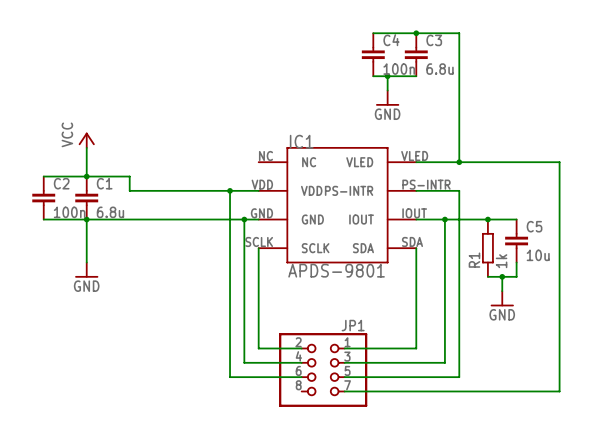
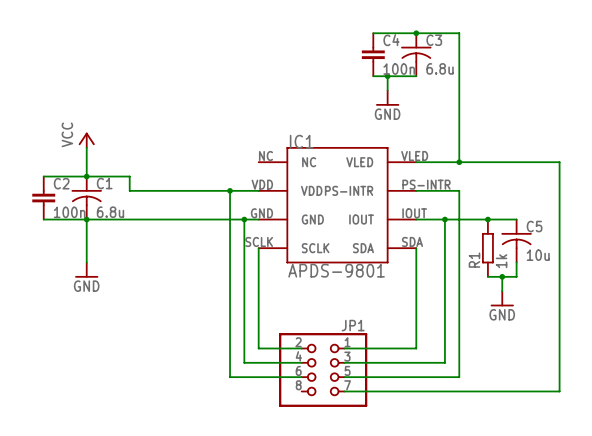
C3 symbol: [404, 33, 428, 77] -> [401, 33, 432, 77]
C1 symbol: [75, 176, 99, 220] -> [71, 176, 102, 220]
C5 symbol: [505, 219, 529, 263] -> [501, 219, 532, 263]

